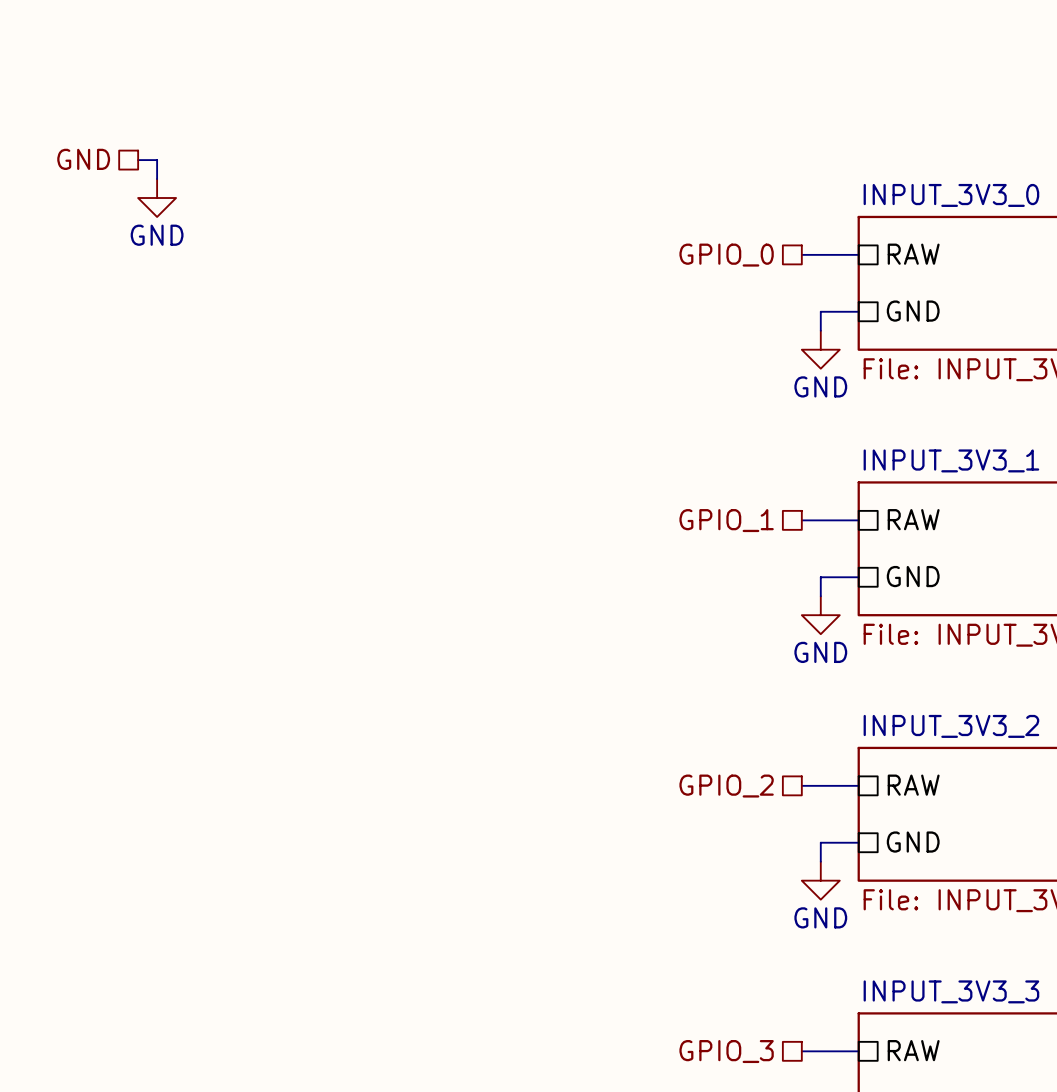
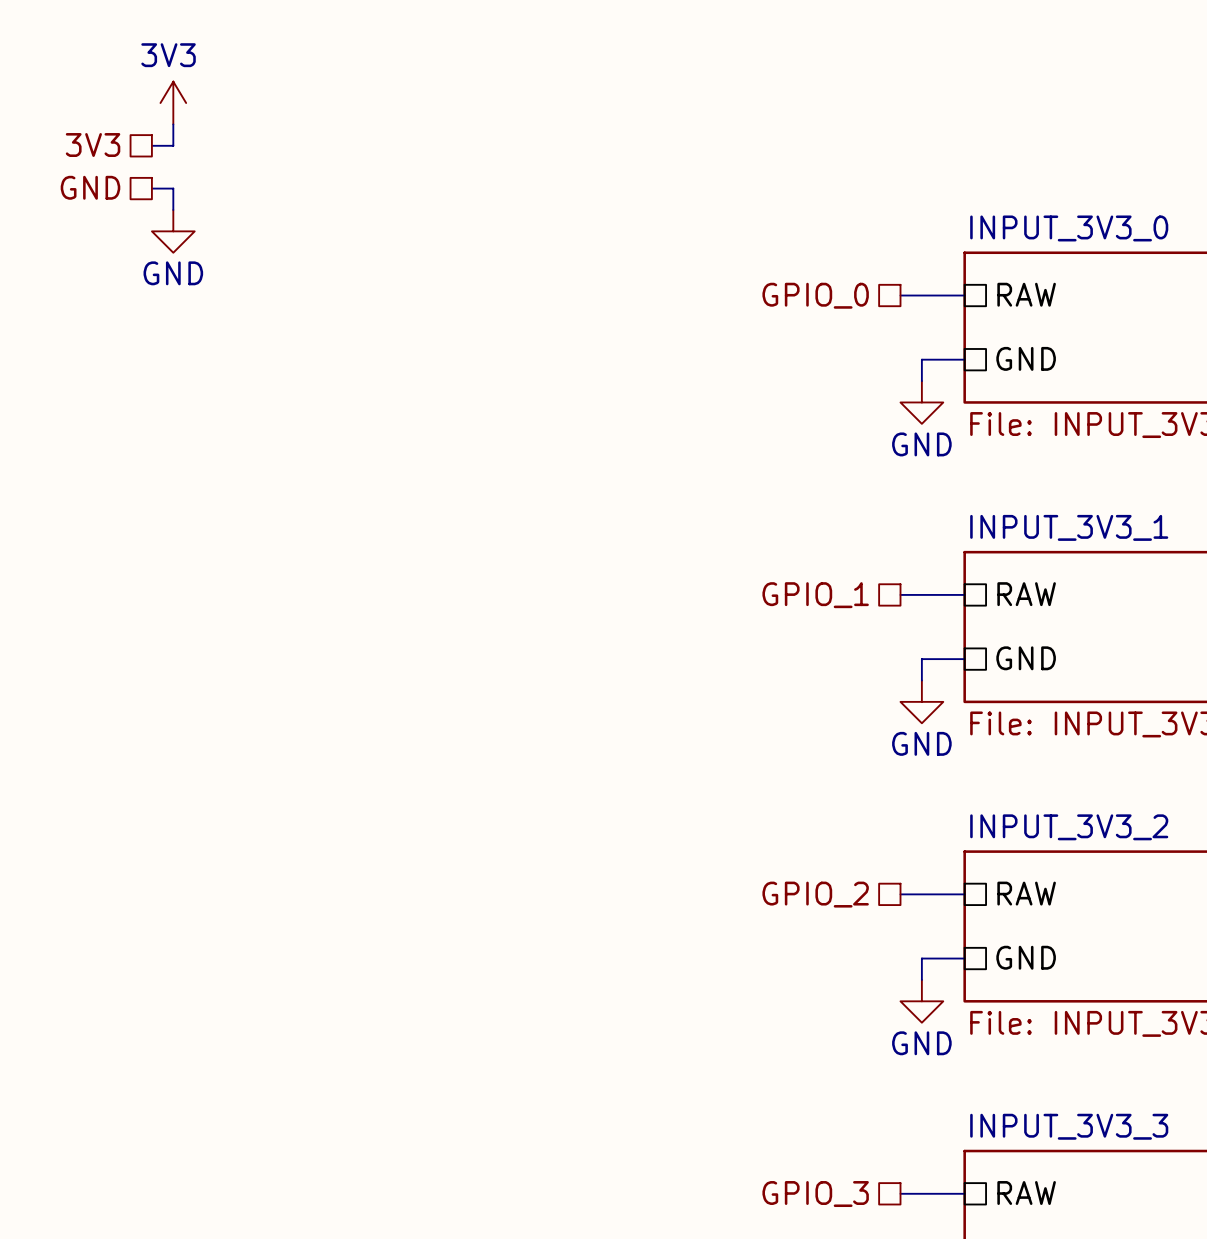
power symbol: none -> 3V3 (173, 103)
wire: none -> (173, 124) (173, 145) (151, 145)
hierarchical label: none -> 3V3 (93, 145)

